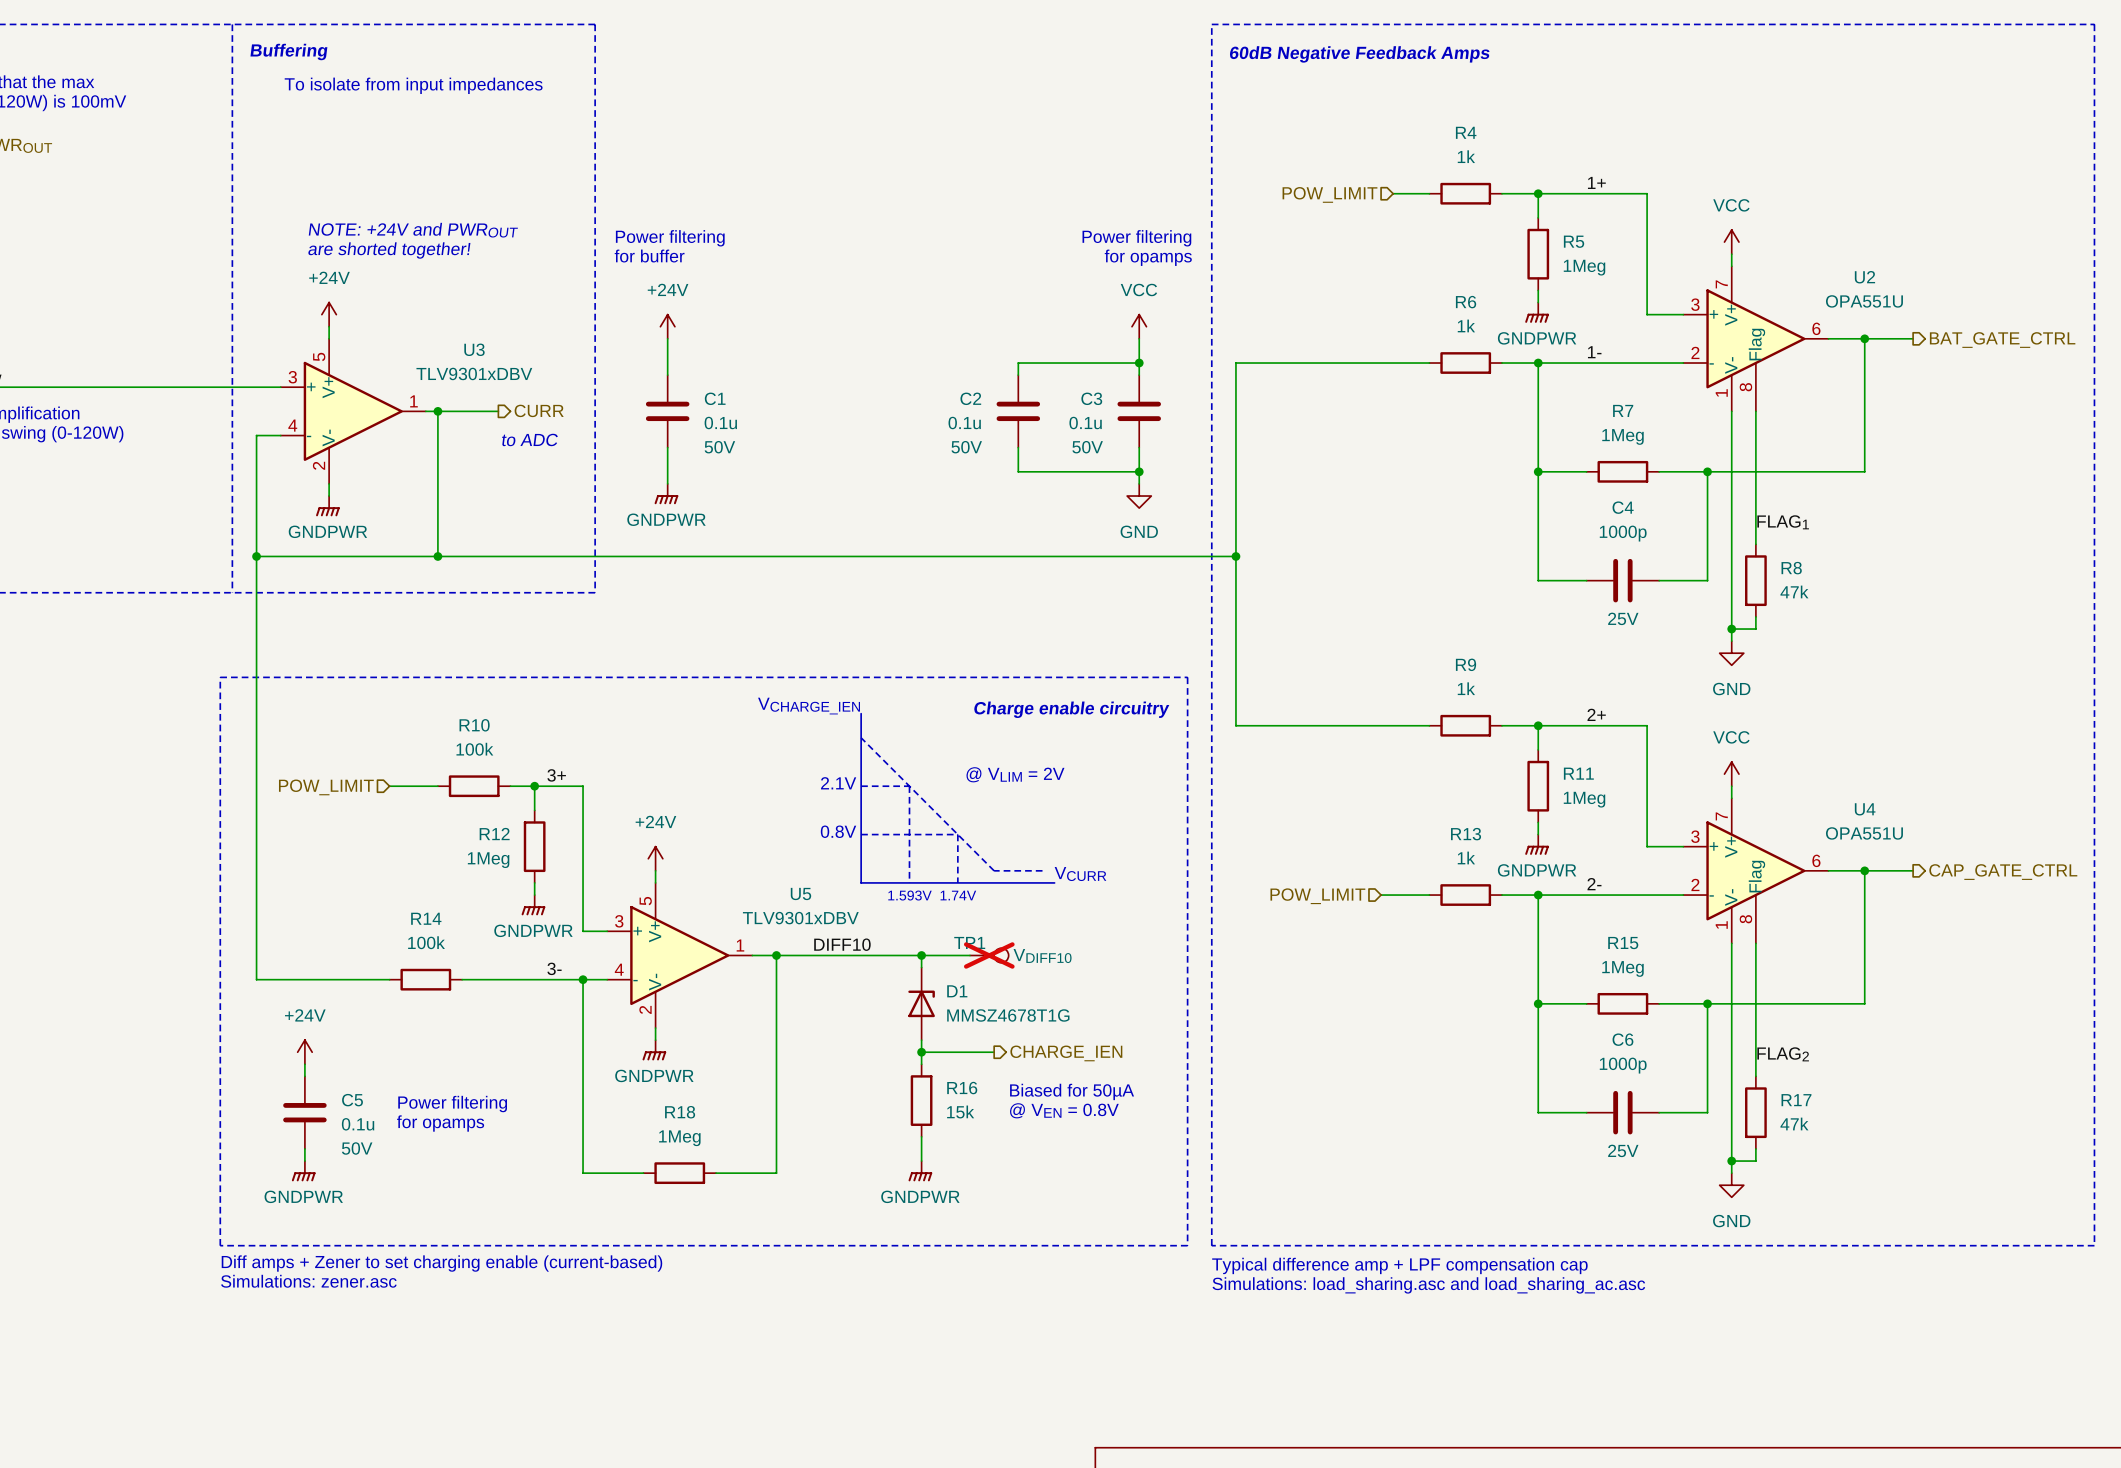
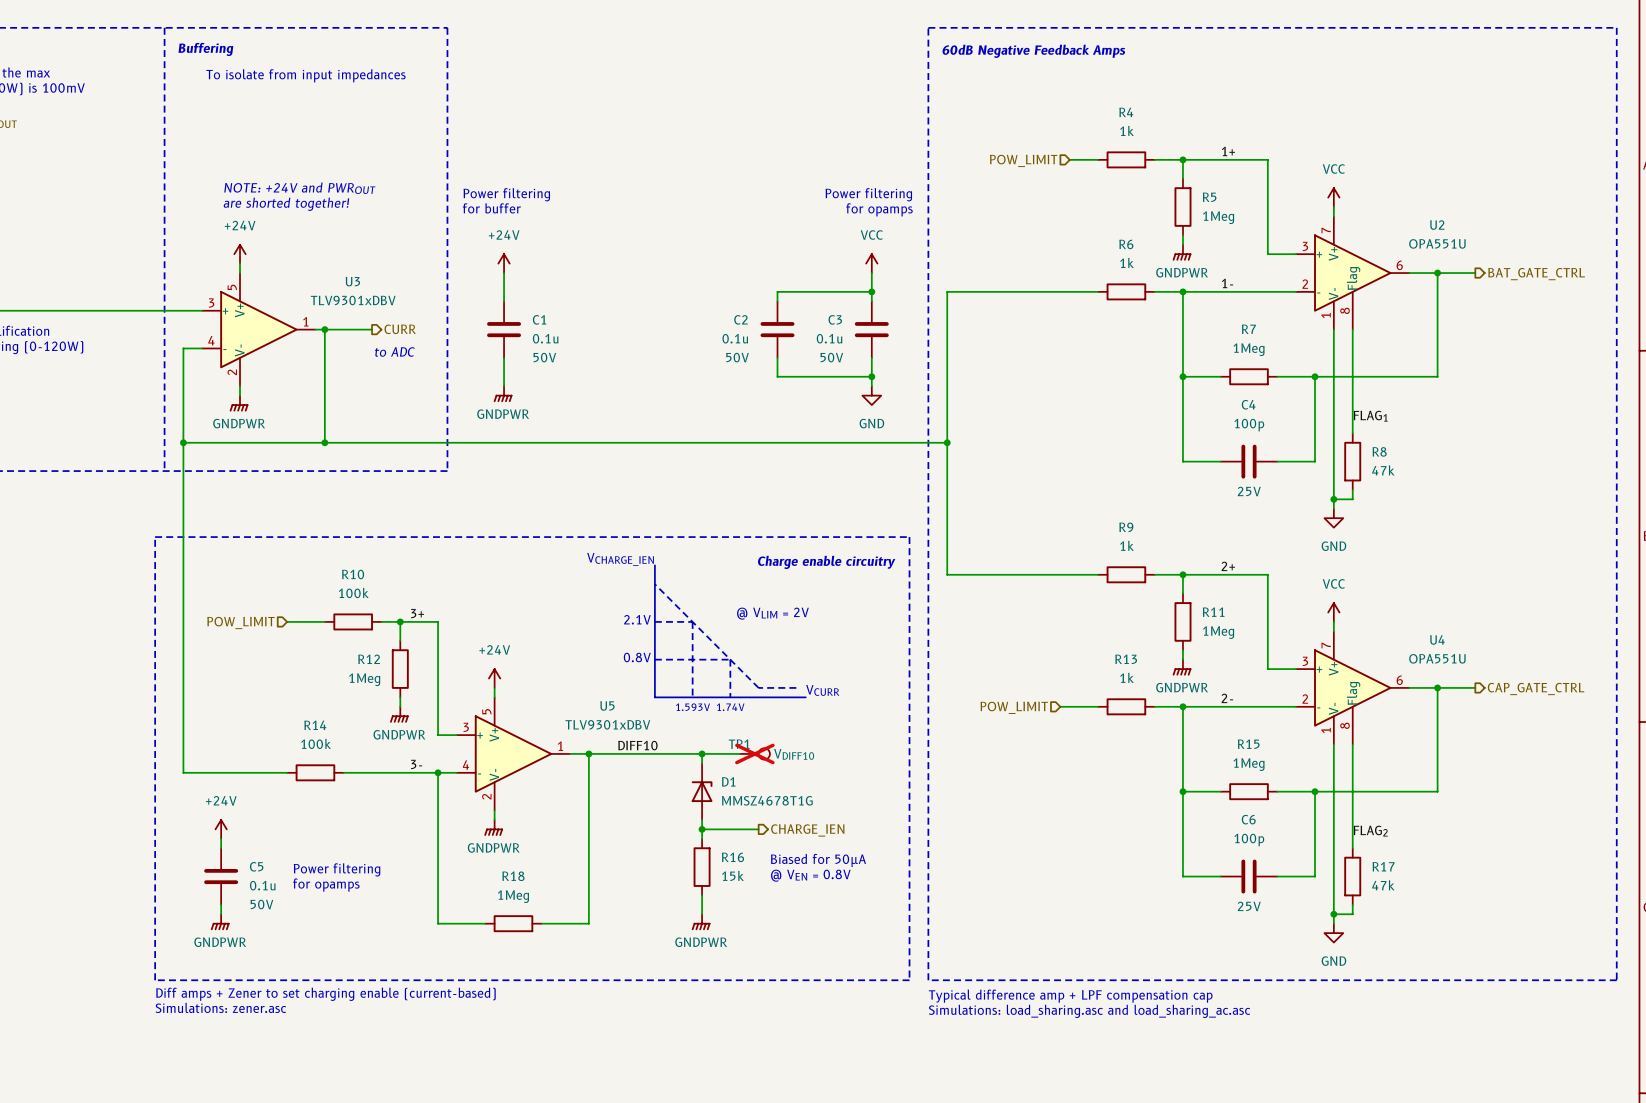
C4 value: 1000p (1623, 533) -> 100p (1249, 425)
C6 value: 1000p (1623, 1065) -> 100p (1249, 840)

